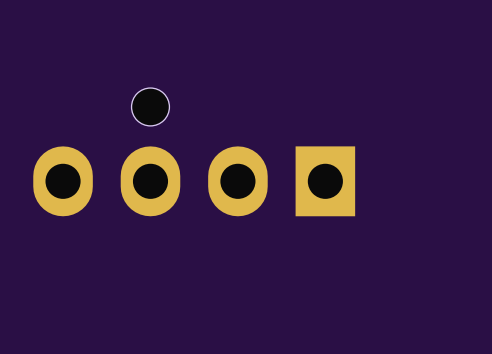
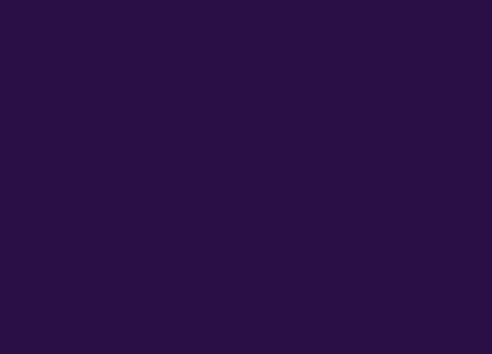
part: (194, 152) -> none

